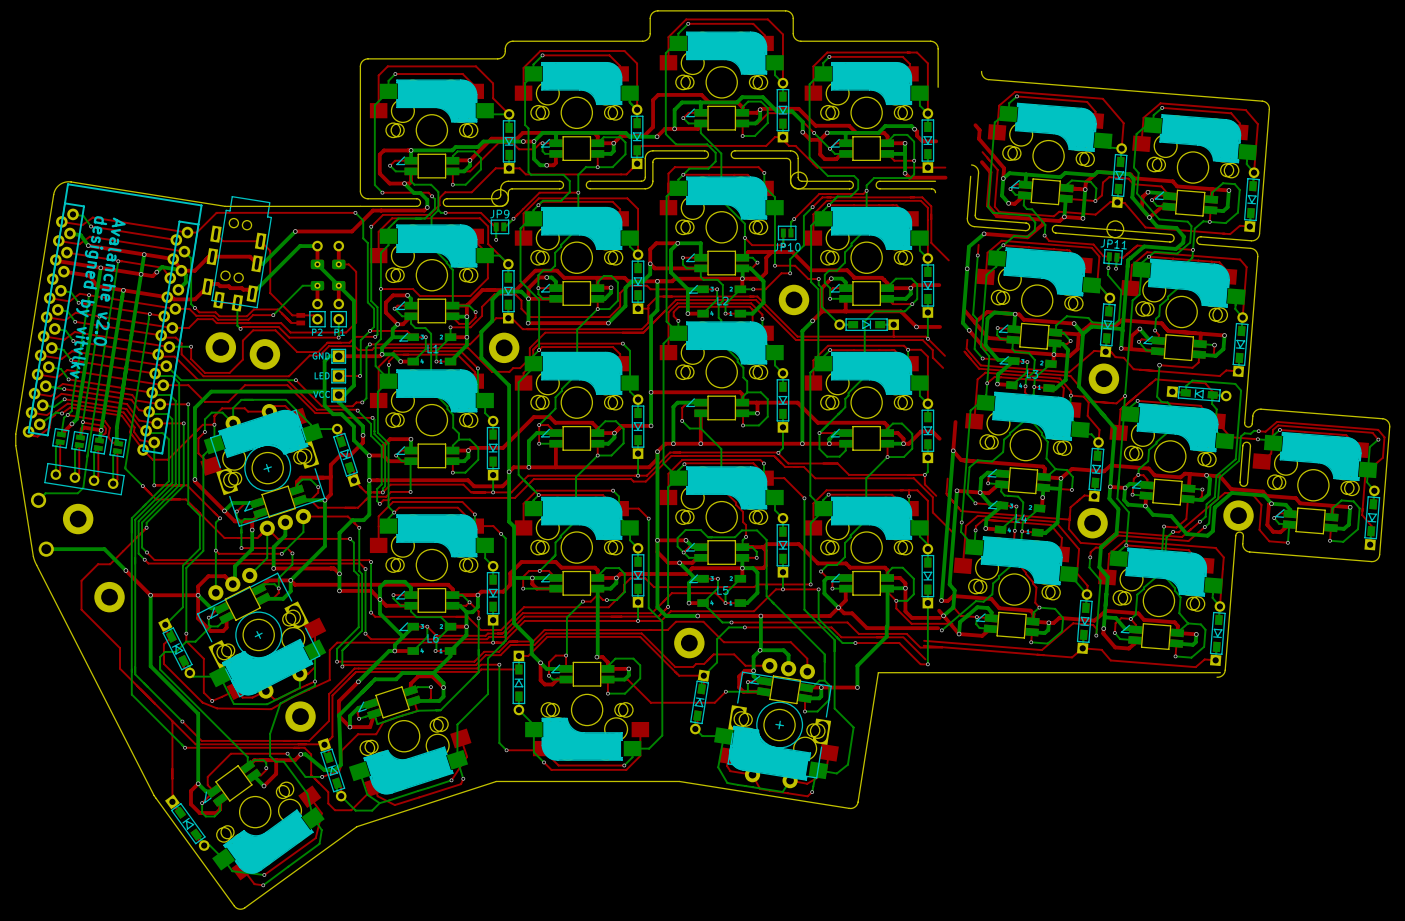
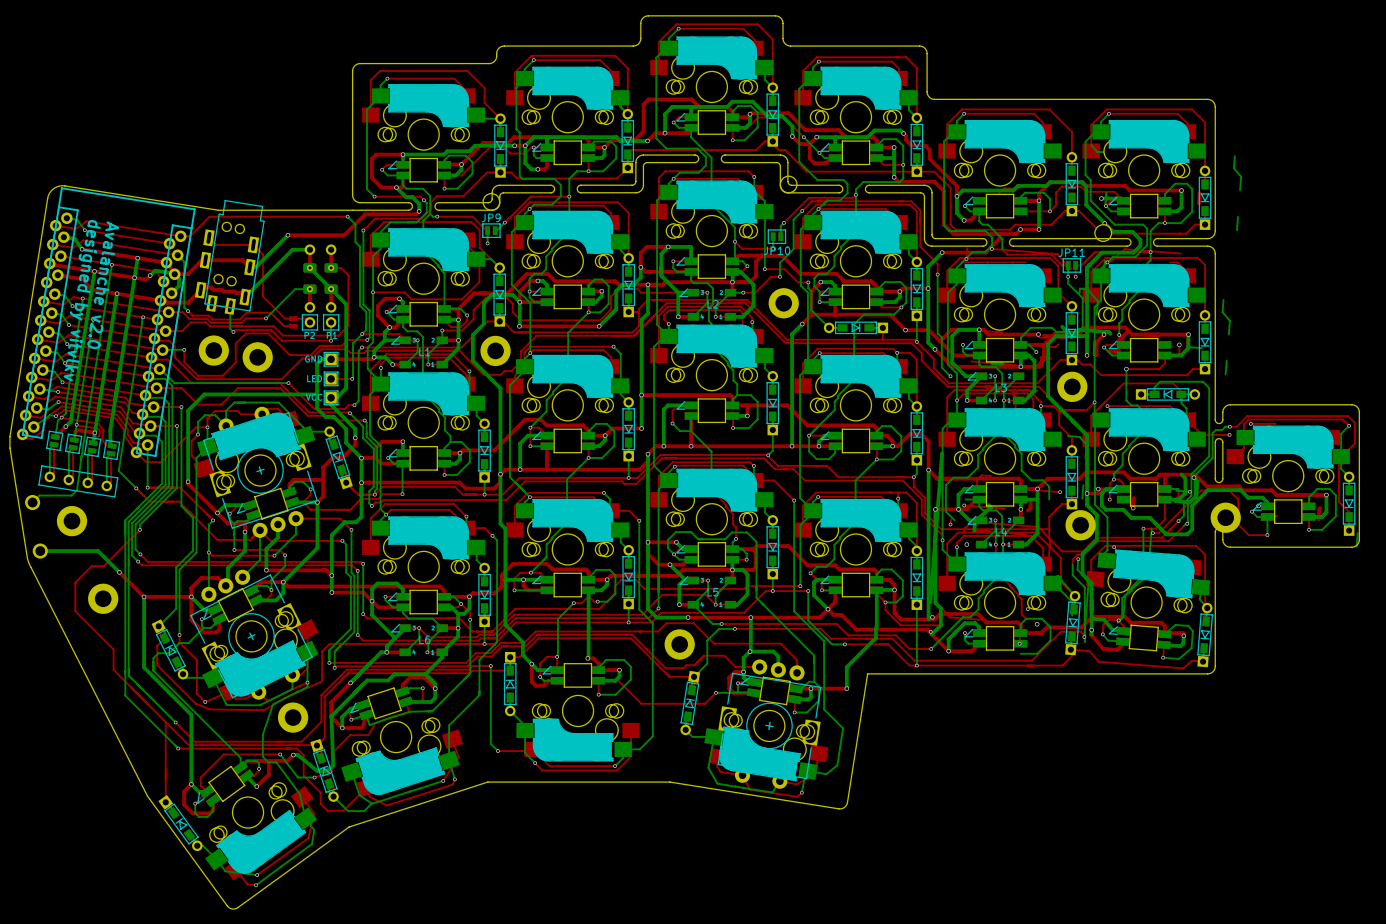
board edge: (981, 71) (983, 76) (988, 79) (1262, 101) (1268, 106) (1258, 236) (1252, 240) (1200, 236) (1196, 241) (1200, 244) (1251, 248) (1257, 253) (1245, 426) (1251, 425) (1253, 413) (1260, 409) (1382, 418) (1388, 422) (1389, 426) (1379, 554) (1377, 559) (1371, 561) (1248, 551) (1243, 546) (1242, 533) (1237, 533) (1225, 670) (1222, 675) (1217, 677) -> none
board edge: none -> (927, 91) (929, 97) (934, 99) (1207, 99) (1214, 104) (1214, 233) (1208, 238) (1156, 238) (1153, 243) (1157, 246) (1208, 246) (1214, 250) (1216, 422) (1222, 421) (1223, 409) (1229, 404) (1351, 404) (1357, 407) (1359, 412) (1359, 539) (1357, 544) (1351, 547) (1229, 547) (1223, 542) (1222, 529) (1216, 529) (1215, 666) (1213, 671) (1207, 673)
top track: (1017, 96) (1087, 101) (1095, 111) (1094, 120) -> none
bottom track: (1017, 96) (1009, 103) (1008, 113) (1005, 113) (994, 122) (988, 207) (992, 212) (1029, 215) (1035, 222) (1034, 230) (1027, 236) (1014, 235) (997, 250) (996, 266) (986, 274) (980, 346) (989, 356) (985, 402) (980, 402) (970, 410) (961, 531) (974, 547) (975, 530) -> none
via: (1017, 96) -> none
top track: (1162, 107) (1231, 113) (1239, 123) (1239, 132) -> none
bottom track: (1162, 107) (1153, 115) (1152, 125) (1147, 124) (1136, 134) (1133, 167) (1138, 172) (1137, 193) (1159, 219) (1187, 221) (1191, 226) (1190, 242) (1177, 253) (1154, 251) (1142, 262) (1139, 294) (1132, 300) (1124, 407) (1130, 414) -> none
via position: (1162, 107) -> (1108, 113)
top track: none -> (964, 113) (1034, 113) (1043, 122) (1043, 131)
bottom track: none -> (964, 113) (956, 120) (956, 131) (953, 131) (944, 141) (944, 225) (949, 231) (985, 231) (992, 237) (992, 245) (985, 252) (972, 252) (956, 267) (956, 283) (947, 293) (947, 364) (956, 373) (956, 419) (951, 419) (942, 428) (942, 549) (956, 564) (956, 547)
via: none -> (964, 113)
top track: none -> (1108, 113) (1177, 113) (1187, 123) (1187, 131)
bottom track: none -> (1108, 113) (1101, 121) (1101, 131) (1095, 131) (1085, 141) (1085, 175) (1090, 180) (1090, 184)
top track: (975, 125) (979, 130) (978, 138) (1004, 168) (1003, 178) -> none
top track: (997, 132) (999, 105) (1015, 91) (1102, 98) (1123, 123) (1120, 162) -> none
part: (1050, 137) -> none
top track: none -> (925, 145) (929, 150) (929, 158) (956, 186) (956, 196)
top track: (1141, 143) (1143, 117) (1160, 103) (1245, 110) (1257, 124) (1253, 186) -> none
top track: none -> (947, 151) (947, 124) (962, 109) (1049, 109) (1071, 131) (1071, 170)
top track: none -> (1091, 151) (1091, 125) (1106, 109) (1192, 109) (1205, 122) (1205, 184)
part: none -> (1000, 153)
part: none -> (1144, 153)
part: (1194, 148) -> none
top track: (982, 152) (997, 169) (994, 206) (999, 211) (1053, 216) (1059, 211) (1095, 214) (1110, 201) (1124, 202) (1145, 227) (1230, 234) (1239, 225) (1249, 226) (1250, 213) -> none
top track: (981, 162) (990, 172) (987, 205) (996, 216) (1059, 221) (1064, 216) (1082, 218) -> none
board edge: (971, 164) (976, 166) (978, 172) (976, 218) (1026, 223) (1029, 225) (1028, 229) (974, 226) (969, 224) (967, 218) (970, 176) -> none
top track: none -> (934, 171) (950, 188) (950, 224) (955, 229) (1010, 229) (1015, 224) (1051, 224) (1065, 211) (1079, 211) (1101, 233) (1186, 233) (1195, 224) (1205, 224) (1205, 211)
bottom track: (1026, 174) (1025, 184) -> none
part: (1119, 175) -> none
top track: none -> (934, 181) (943, 190) (943, 224) (953, 234) (1015, 234) (1020, 229) (1039, 229)
via: (1003, 178) -> none
part: none -> (1071, 184)
bottom track: none -> (1090, 184) (1090, 200) (1114, 224) (1143, 224) (1147, 228) (1147, 245) (1135, 257) (1112, 257) (1101, 268) (1101, 300) (1094, 307) (1094, 413) (1101, 419) (1094, 426) (1094, 504) (1107, 517) (1107, 550) (1101, 556) (1101, 564)
board edge: none -> (924, 185) (929, 187) (931, 191) (933, 237) (983, 238) (986, 240) (986, 244) (931, 246) (927, 244) (924, 238) (924, 196)
top track: none -> (1181, 190) (1129, 190) (1125, 185) (1086, 185) (1082, 182) (1050, 182) (1039, 193) (1039, 200)
bottom track: none -> (1181, 190) (1181, 207) (1177, 211) (1164, 211)
via: none -> (1181, 190)
top track: (1067, 188) (1084, 189) -> none
bottom track: (1067, 188) (1067, 184) (1071, 180) (1090, 181) (1096, 188) (1095, 201) -> none
bottom track: (1010, 189) (1015, 194) (1024, 195) (1023, 205) (1026, 209) (1032, 209) (1045, 224) (1044, 235) -> none
via: (1010, 189) -> none
top track: (1085, 189) (1085, 182) (1098, 171) (1130, 174) (1134, 178) (1172, 181) (1177, 186) (1228, 190) -> none
bottom track: (1085, 189) (1082, 218) -> none
via: (1085, 189) -> none
bottom track: (1228, 190) (1227, 207) (1223, 211) (1210, 210) -> none
via: (1228, 190) -> none
part: (1042, 191) -> none
via: none -> (956, 196)
top track: (1147, 192) (1142, 196) (1141, 208) (1149, 217) (1162, 206) (1168, 206) -> none
bottom track: (1147, 192) (1167, 193) (1169, 196) -> none
via: (1147, 192) -> none
part: none -> (1205, 197)
bottom track: none -> (1101, 198) (1121, 198) (1123, 200)
via: none -> (1101, 198)
top track: (1024, 195) (1014, 203) (1008, 203) -> none
bottom track: none -> (1020, 200) (1020, 197) (1025, 192) (1043, 192) (1049, 198) (1049, 211)
top track: none -> (1038, 200) (1020, 200)
bottom track: none -> (1039, 200) (1039, 229)
via: none -> (1039, 200)
bottom track: none -> (1164, 200) (1164, 193) (1175, 183) (1186, 183) (1192, 189) (1192, 211) (1180, 223) (1158, 223) (1150, 231) (1150, 260) (1144, 266) (1144, 285) (1122, 309) (1119, 335)
top track: (1066, 198) (1095, 201) (1101, 195) (1102, 182) (1109, 177) (1128, 178) (1133, 184) (1161, 186) (1169, 196) (1157, 195) (1151, 200) -> none
bottom track: (1066, 198) (1064, 216) -> none
bottom track: (1211, 199) (1212, 192) (1223, 183) (1234, 184) (1239, 189) (1237, 212) (1225, 223) (1203, 221) (1194, 228) (1192, 257) (1185, 263) (1183, 283) (1160, 305) (1155, 330) -> none
part: (1251, 199) -> none
bottom track: (1151, 200) (1156, 205) (1168, 206) -> none
via: (1151, 200) -> none
via: (1095, 201) -> none
bottom track: none -> (964, 206) (970, 211) (979, 211) (979, 221) (982, 224) (987, 224) (1002, 238) (1002, 249)
via: none -> (964, 206)
part: none -> (996, 206)
top track: none -> (1105, 206) (1111, 200) (1123, 200) (1114, 191) (1086, 191) (1081, 186) (1061, 186) (1056, 192) (1056, 205) (1049, 211) (1020, 211)
bottom track: none -> (1105, 206) (1111, 211) (1123, 211)
via: none -> (1105, 206)
part: none -> (1140, 206)
bottom track: (1008, 203) (1001, 195) (1003, 178) (1009, 173) (1060, 177) (1065, 172) (1093, 175) (1097, 171) (1129, 174) (1133, 179) (1132, 197) (1157, 226) (1176, 228) (1183, 236) (1183, 242) (1175, 248) (1144, 246) (1130, 257) -> none
via: (1008, 203) -> none
part: (1186, 203) -> none
top track: none -> (979, 211) (970, 220) (964, 220)
via: none -> (1049, 211)
top track: none -> (1164, 211) (1164, 223)
top track: (1210, 210) (1209, 221) -> none
bottom track: none -> (964, 220) (956, 213) (956, 196) (962, 190) (1013, 190) (1018, 185) (1046, 185) (1049, 182) (1081, 182) (1086, 186) (1086, 204) (1113, 231) (1132, 231) (1140, 239) (1140, 245) (1133, 252) (1101, 252) (1089, 264)
via: none -> (964, 220)
via: (1064, 216) -> none
via: (1149, 217) -> none
via: (1082, 218) -> none
top track: (1043, 219) (1042, 224) (1027, 237) (984, 233) -> none
via: none -> (1104, 223)
via: none -> (1164, 223)
via: (1209, 221) -> none
via: none -> (1020, 229)
via: none -> (1039, 229)
board edge: (1056, 225) (1170, 234) (1174, 238) (1170, 242) (1055, 233) (1052, 228) (1056, 225) -> none
top track: none -> (1000, 234) (999, 238) (985, 252) (942, 252)
bottom track: (984, 233) (968, 246) (962, 323) (969, 330) -> none
via: (984, 233) -> none
board edge: none -> (1127, 238) (1013, 238) (1009, 242) (1013, 246) (1127, 246) (1130, 242) (1127, 238)
top track: (1044, 235) (1049, 241) (1093, 244) (1103, 256) (1109, 256) (1108, 268) -> none
via: (1044, 235) -> none
top track: none -> (1002, 249) (1007, 254) (1051, 254) (1062, 265) (1068, 265) (1068, 276)
bottom track: none -> (942, 252) (928, 266) (928, 342) (935, 349)
via: none -> (942, 252)
top track: none -> (1150, 252) (1094, 252) (1081, 265) (1075, 265) (1075, 276)
via: none -> (1150, 252)
via: (1193, 249) -> none
bottom track: (977, 255) (973, 314) (976, 319) (974, 349) (982, 358) -> none
bottom track: (1109, 256) (1107, 274) (1121, 290) (1119, 320) (1114, 324) (1092, 322) (1088, 318) (1066, 316) (1056, 325) (1055, 332) (1064, 333) (1070, 341) -> none
part: (1113, 256) -> none
top track: (1148, 256) (1219, 262) (1228, 272) (1227, 276) -> none
via: (1148, 256) -> none
bottom track: (1130, 257) (1128, 260) (1121, 348) -> none
top track: none -> (987, 262) (962, 262)
top track: none -> (1012, 262) (987, 262)
top track: none -> (1025, 262) (1012, 262)
via: none -> (1107, 262)
top track: none -> (1170, 262) (1177, 262) (1187, 271) (1187, 275)
top track: none -> (937, 263) (937, 274)
bottom track: none -> (1068, 265) (1068, 283) (1082, 298) (1082, 327) (1078, 331) (1056, 331) (1052, 327) (1030, 327) (1020, 337) (1020, 344) (1029, 344) (1036, 352)
part: none -> (1071, 265)
bottom track: none -> (1089, 264) (1087, 267) (1087, 355)
via: (967, 268) -> none
via: (1108, 268) -> none
via: (1116, 268) -> none
bottom track: none -> (937, 274) (937, 333) (941, 337) (941, 367) (950, 376)
via: none -> (937, 274)
via: none -> (1068, 276)
via: none -> (1075, 276)
top track: (985, 276) (987, 252) (1001, 240) (1091, 247) (1099, 256) (1097, 283) (1109, 297) (1108, 311) -> none
part: (1038, 281) -> none
via: none -> (928, 288)
top track: (1130, 288) (1131, 265) (1147, 252) (1240, 259) (1246, 267) (1241, 331) -> none
top track: none -> (947, 295) (947, 271) (960, 258) (1050, 258) (1058, 266) (1058, 292) (1071, 306) (1071, 319)
top track: none -> (1091, 295) (1091, 272) (1105, 258) (1198, 258) (1205, 265) (1205, 328)
part: none -> (1000, 297)
part: none -> (1144, 297)
part: (1183, 293) -> none
top track: (964, 310) (988, 337) (1013, 339) -> none
via: (1015, 314) -> none
top track: (974, 322) (987, 311) (1019, 314) (1023, 319) (1074, 323) -> none
via: (1074, 323) -> none
part: (1107, 325) -> none
top track: none -> (928, 330) (954, 355) (979, 355)
via: none -> (979, 329)
bottom track: (997, 328) (997, 334) (1000, 338) (1013, 339) (1012, 349) (1014, 351) (1028, 352) (1034, 359) (1033, 372) (1026, 378) (1025, 386) -> none
via: (997, 328) -> none
bottom track: (1139, 328) (1149, 339) (1158, 340) -> none
via: (1139, 328) -> none
bottom track: (1013, 329) (1015, 314) (994, 312) (987, 318) (985, 345) (997, 359) (1006, 360) -> none
part: none -> (1071, 333)
top track: (969, 330) (985, 349) (1069, 355) (1077, 349) (1078, 334) (1090, 324) (1114, 326) (1121, 320) (1161, 323) (1168, 331) (1224, 335) -> none
via: (969, 330) -> none
top track: (1155, 330) (1158, 334) (1158, 340) (1141, 339) (1138, 341) -> none
via: (1155, 330) -> none
top track: none -> (1038, 334) (988, 334) (983, 329) (951, 329) (940, 341)
via: none -> (1038, 334)
top track: none -> (1104, 334) (1096, 342) (1095, 355)
via: none -> (1104, 334)
top track: none -> (1119, 335) (1123, 339) (1123, 344) (1106, 344) (1104, 347)
via: none -> (1119, 335)
top track: none -> (1188, 334) (1132, 334) (1125, 327) (1085, 327) (1079, 333) (1054, 333) (1043, 344)
bottom track: none -> (1188, 334) (1188, 348) (1181, 355) (1164, 355)
via: none -> (1188, 334)
bottom track: (1083, 333) (1078, 386) (1114, 428) (1109, 498) (1118, 509) (1116, 533) (1100, 547) (1099, 567) (1107, 577) (1103, 628) -> none
bottom track: none -> (1087, 337) (1056, 336) (1048, 344) (1048, 396) (1087, 435) (1087, 505) (1096, 515) (1096, 539) (1082, 554) (1082, 574) (1091, 583) (1091, 634)
bottom track: (1224, 335) (1223, 349) (1215, 355) (1199, 354) -> none
via: (1224, 335) -> none
part: (1030, 336) -> none
top track: (967, 339) (966, 348) (980, 365) (1069, 372) (1094, 350) (1111, 352) (1115, 357) (1123, 357) (1133, 369) (1219, 376) (1226, 370) (1238, 371) (1239, 357) -> none
part: none -> (1205, 342)
bottom track: none -> (963, 344) (963, 351) (966, 355) (979, 355) (979, 364) (981, 367) (995, 367) (1002, 373) (1002, 385) (995, 392) (995, 400)
via: none -> (963, 344)
bottom track: none -> (979, 344) (979, 329) (958, 329) (952, 336) (952, 362) (965, 376) (981, 376)
top track: none -> (1043, 344) (1020, 344)
top track: none -> (1043, 344) (1043, 359) (1036, 366) (952, 366) (935, 349)
via: (1070, 341) -> none
bottom track: (1138, 341) (1146, 350) (1157, 351) -> none
via: (1138, 341) -> none
top track: none -> (1179, 344) (1179, 353) (1177, 355) (1164, 355) (1164, 363) (1159, 369) (1126, 369)
via: none -> (1179, 344)
bottom track: none -> (1104, 347) (1112, 355) (1123, 355)
via: none -> (1104, 347)
part: (1240, 344) -> none
top track: (1214, 345) (1213, 353) (1211, 355) (1199, 354) (1198, 362) (1192, 367) (1159, 365) -> none
via: (1214, 345) -> none
via: none -> (935, 349)
part: none -> (996, 350)
part: none -> (1140, 350)
part: (1175, 347) -> none
via: (1121, 348) -> none
via: none -> (1036, 352)
top track: (1129, 349) (1157, 351) -> none
top track: (964, 351) (979, 368) (1070, 375) (1092, 401) (1116, 403) (1125, 396) -> none
via: none -> (1087, 355)
top track: none -> (1205, 355) (1205, 369) (1192, 369) (1186, 375) (1101, 375) (1090, 364) (1082, 364) (1077, 360) (1060, 360) (1037, 383) (949, 383) (933, 367) (933, 358)
bottom track: (1053, 354) (1054, 343) (1062, 343) (1068, 349) (1065, 379) (1055, 388) (1049, 388) -> none
via: (1053, 354) -> none
via: (982, 358) -> none
bottom track: (1014, 361) (998, 374) (997, 384) -> none
bottom track: (1027, 362) (1026, 372) (1011, 385) -> none
via: (1027, 362) -> none
bottom track: none -> (1020, 366) (1020, 355) (1028, 355) (1034, 361) (1034, 391) (1025, 400) (1018, 400)
via: none -> (1020, 366)
bottom track: (1050, 363) (1034, 377) (1033, 394) (1028, 399) (1026, 418) (1004, 439) (1003, 452) (992, 461) (977, 460) (969, 467) (967, 493) (975, 503) -> none
bottom track: (1159, 365) (1157, 396) (1161, 401) (1167, 402) (1173, 409) (1172, 428) (1149, 449) (1148, 461) (1138, 469) (1138, 474) -> none
via: (1159, 365) -> none
bottom track: none -> (1126, 369) (1126, 400) (1131, 405) (1137, 405) (1143, 411) (1143, 431) (1122, 453) (1122, 465) (1113, 473) (1113, 479)
via: none -> (1126, 369)
top track: none -> (932, 370) (947, 386) (1038, 386) (1062, 410) (1086, 410) (1094, 402)
via: none -> (950, 376)
bottom track: none -> (981, 376) (967, 390) (967, 400)
bottom track: none -> (995, 376) (995, 386) (981, 400)
via: none -> (995, 376)
bottom track: none -> (1018, 376) (1003, 391) (1003, 408) (998, 412) (998, 432) (978, 454) (978, 467) (967, 477) (953, 477) (945, 485) (945, 511) (954, 520)
part: (1028, 374) -> none
part position: (1103, 378) -> (1072, 386)
top track: (987, 383) (994, 376) (1058, 381) (1063, 388) (1062, 401) (1069, 409) (1072, 409) -> none
via: (987, 383) -> none
via: (997, 384) -> none
part: none -> (996, 388)
via: (1025, 386) -> none
via: (1034, 386) -> none
bottom track: none -> (1141, 394) (1154, 394) (1154, 387) (1160, 381) (1202, 381) (1209, 387) (1209, 456) (1191, 474) (1191, 495) (1183, 503) (1183, 515) (1178, 521)
bottom track: (1172, 391) (1185, 392) (1186, 385) (1192, 380) (1235, 383) (1241, 390) (1235, 459) (1216, 475) (1214, 497) (1206, 504) (1205, 516) (1199, 521) -> none
part: none -> (1167, 394)
top track: none -> (1194, 394) (1181, 394) (1181, 391) (1173, 383) (1123, 383) (1091, 415) (1091, 439)
bottom track: none -> (1194, 394) (1181, 394) (1181, 403) (1186, 408) (1186, 428) (1197, 439)
part: (1199, 393) -> none
bottom track: (1070, 395) (1069, 416) (1080, 429) -> none
via: (1070, 395) -> none
top track: (1226, 395) (1212, 394) (1212, 392) (1205, 383) (1155, 379) (1120, 409) (1118, 432) -> none
bottom track: (1226, 395) (1212, 394) (1212, 403) (1216, 409) (1215, 429) (1224, 441) -> none
via: (1125, 396) -> none
top track: none -> (956, 400) (963, 393) (1027, 393) (1033, 399) (1033, 412) (1040, 419) (1043, 419) (1043, 415)
via: none -> (956, 400)
via: none -> (967, 400)
top track: none -> (981, 400) (967, 400)
via: none -> (995, 400)
via: none -> (1003, 400)
top track: none -> (1018, 400) (1003, 400)
via: none -> (1094, 402)
top track: (1137, 400) (1200, 405) (1213, 420) (1224, 421) -> none
bottom track: (1137, 400) (1130, 406) (1130, 414) -> none
via: (1137, 400) -> none
bottom track: none -> (1040, 406) (1040, 427) (1053, 439)
via: none -> (1040, 406)
top track: none -> (1107, 406) (1170, 406) (1184, 419) (1194, 419)
via: none -> (1107, 406)
bottom track: (1130, 414) (1123, 419) (1117, 498) (1128, 512) (1126, 545) (1119, 551) (1118, 558) -> none
top track: (974, 421) (977, 379) (985, 372) (1060, 378) (1071, 391) (1070, 395) (1083, 396) (1088, 402) (1087, 415) (1099, 429) (1097, 455) -> none
bottom track: (1032, 421) (1047, 441) (1046, 458) (1055, 469) -> none
top track: none -> (1187, 424) (1187, 419) (1202, 434) (1229, 434)
via: none -> (1250, 423)
top track: none -> (1275, 423) (1250, 423)
top track: (955, 422) (953, 450) (961, 460) (1043, 466) (1044, 468) (1044, 477) (1060, 478) (1072, 468) (1103, 471) (1110, 465) (1148, 468) (1154, 475) (1180, 477) (1184, 473) (1190, 474) -> none
top track: none -> (1349, 425) (1342, 419) (1248, 419) (1243, 424) (1243, 447) (1235, 456)
bottom track: none -> (1349, 425) (1341, 433) (1341, 468) (1349, 476) (1349, 490)
top track: none -> (1229, 426) (1236, 426) (1247, 416) (1348, 416) (1355, 422) (1355, 443) (1338, 459) (1338, 501) (1349, 512) (1349, 530)
bottom track: none -> (1229, 426) (1216, 429) (1212, 433) (1212, 457) (1194, 475) (1194, 497) (1187, 504) (1187, 522) (1183, 526)
via: none -> (1229, 426)
top track: (1216, 425) (1216, 421) (1230, 437) (1257, 439) -> none
part: (1027, 426) -> none
top track: (1279, 429) (1304, 431) -> none
via: (1279, 429) -> none
top track: (1258, 431) (1265, 431) (1277, 421) (1378, 429) (1384, 437) (1382, 457) (1365, 472) (1362, 515) (1371, 526) (1370, 544) -> none
bottom track: (1258, 431) (1244, 433) (1240, 436) (1239, 460) (1219, 477) (1218, 498) (1210, 505) (1209, 523) (1204, 527) -> none
via: (1258, 431) -> none
top track: (1304, 431) (1330, 433) -> none
bottom track: none -> (1004, 434) (1021, 453) (1021, 470) (1031, 480) (1042, 480) (1049, 486) (1049, 499)
via: none -> (1229, 434)
top track: (1330, 433) (1346, 435) (1359, 449) -> none
top track: none -> (947, 439) (947, 397) (954, 390) (1028, 390) (1040, 402) (1040, 406) (1053, 406) (1059, 411) (1059, 425) (1071, 437) (1071, 463)
part: (1171, 437) -> none
top track: none -> (928, 441) (928, 470) (937, 478) (1018, 478) (1020, 480) (1020, 488) (1037, 488) (1047, 478) (1079, 478) (1085, 472) (1123, 472) (1130, 478) (1155, 478) (1160, 474) (1195, 474) (1206, 486) (1238, 486) (1242, 490) (1271, 490) (1276, 495) (1326, 495)
part: none -> (1000, 441)
part: none -> (1144, 441)
board edge: none -> (1222, 442) (1222, 479) (1218, 482) (1215, 479) (1215, 441) (1219, 438) (1222, 442)
via: (1257, 439) -> none
top track: (1378, 439) (1372, 432) (1278, 425) (1273, 429) (1271, 453) (1261, 461) -> none
bottom track: (1378, 439) (1369, 446) (1367, 482) (1374, 490) (1373, 504) -> none
via position: (1378, 439) -> (1349, 425)
board edge: (1242, 445) (1240, 482) (1243, 486) (1247, 483) (1250, 445) (1246, 442) (1242, 445) -> none
via: (953, 450) -> none
part: none -> (1288, 458)
part: (1314, 466) -> none
bottom track: none -> (928, 470) (928, 619)
via: none -> (928, 470)
bottom track: (1055, 469) (1044, 477) -> none
bottom track: (1055, 469) (1066, 470) (1072, 477) (1071, 489) -> none
part: (1096, 469) -> none
top track: none -> (1165, 474) (1164, 488)
bottom track: none -> (1181, 474) (1185, 478) (1185, 493) (1178, 499) (1164, 499)
bottom track: (1002, 473) (987, 472) (981, 478) (980, 492) (990, 504) (1002, 505) -> none
part: none -> (1071, 477)
via: (1138, 474) -> none
top track: (1190, 474) (1188, 488) -> none
top track: (1190, 474) (1220, 476) (1231, 489) (1262, 491) (1266, 495) (1295, 498) (1300, 503) (1350, 507) -> none
via: none -> (1113, 479)
top track: (947, 478) (946, 493) (961, 511) (1069, 520) -> none
bottom track: (1060, 478) (1057, 522) (1045, 533) (1037, 532) -> none
via: (1060, 478) -> none
part: (1019, 480) -> none
bottom track: (988, 483) (1001, 484) (1001, 491) (1004, 495) (1018, 496) (1023, 502) (1022, 516) (1015, 522) (1014, 530) -> none
via: (988, 483) -> none
top track: (1001, 484) (999, 484) (988, 493) (956, 490) -> none
top track: (1147, 485) (1147, 479) (1143, 475) (1138, 474) (1133, 478) (1132, 494) -> none
bottom track: (1147, 485) (1129, 483) (1125, 488) (1124, 500) (1128, 504) (1145, 506) (1152, 514) (1171, 516) (1186, 534) (1207, 535) (1212, 531) (1214, 507) (1231, 492) (1264, 495) (1271, 503) (1285, 504) (1290, 510) (1290, 513) -> none
bottom track: none -> (979, 488) (964, 488) (958, 495) (958, 509) (969, 520) (981, 520)
bottom track: none -> (1037, 488) (1037, 533) (1026, 544) (1018, 544)
via: none -> (1037, 488)
top track: none -> (1123, 488) (1123, 483) (1119, 479) (1113, 479) (1109, 483) (1109, 499)
bottom track: none -> (1123, 488) (1106, 488) (1101, 493) (1101, 505) (1106, 509) (1123, 509) (1131, 517) (1150, 517) (1166, 534) (1187, 534) (1192, 529) (1192, 505) (1207, 490) (1240, 490) (1248, 497) (1262, 497) (1267, 502) (1267, 506)
top track: none -> (1178, 488) (1178, 496) (1175, 499) (1164, 499) (1164, 519) (1155, 528) (1143, 528)
bottom track: none -> (1178, 488) (1164, 488)
bottom track: (1060, 488) (1043, 487) (1042, 497) -> none
top track: none -> (1071, 490) (1071, 504) (1062, 504) (1049, 516) (1049, 538) (1062, 551) (1083, 551) (1096, 537) (1161, 537) (1178, 521)
via: (1125, 488) -> none
top track: (1202, 489) (1201, 496) (1198, 499) (1187, 499) (1186, 519) (1176, 527) (1164, 526) -> none
bottom track: (956, 490) (949, 584) (954, 590) (953, 607) (943, 615) -> none
via: (956, 490) -> none
via: none -> (1087, 493)
top track: none -> (1101, 493) (1087, 493)
via: (980, 492) -> none
part: none -> (996, 494)
part: none -> (1140, 494)
part: (1163, 492) -> none
bottom track: none -> (1326, 495) (1326, 512) (1321, 516) (1309, 516)
bottom track: (1132, 494) (1146, 495) -> none
via: (1132, 494) -> none
top track: none -> (925, 498) (925, 513) (941, 529) (1049, 529)
bottom track: none -> (1037, 499) (1020, 499) (1020, 509)
top track: (1094, 496) (1084, 495) (1070, 507) (1068, 528) (1080, 542) (1101, 544) (1116, 531) (1181, 537) (1199, 521) -> none
bottom track: none -> (965, 499) (979, 499) (979, 506) (982, 510) (996, 510) (1002, 515) (1002, 530) (995, 536) (995, 544)
top track: none -> (979, 499) (976, 499) (966, 509) (935, 509)
via: (1042, 497) -> none
via: none -> (1109, 499)
part: none -> (1349, 503)
top track: (1271, 503) (1268, 504) (1267, 524) (1273, 531) (1280, 532) (1289, 524) -> none
bottom track: none -> (1309, 506) (1309, 497) (1317, 488) (1329, 488) (1335, 495) (1335, 516) (1322, 529) (1309, 529)
bottom track: (1016, 506) (1015, 516) (1000, 529) -> none
via: (1016, 506) -> none
bottom track: none -> (935, 509) (935, 602) (940, 608) (940, 625) (931, 634)
via: none -> (935, 509)
via: none -> (958, 509)
top track: none -> (1020, 509) (1020, 518) (1018, 520)
via: none -> (1020, 509)
bottom track: (1350, 507) (1348, 524) (1343, 528) (1331, 527) -> none
via position: (1350, 507) -> (1326, 495)
bottom track: (1039, 508) (1022, 522) (1021, 539) (1017, 542) (1016, 561) (993, 583) (992, 594) (983, 601) (976, 601) (941, 630) -> none
bottom track: none -> (1251, 511) (1257, 516) (1267, 516) (1267, 535)
via: none -> (1251, 511)
part: none -> (1284, 511)
top track: none -> (1309, 516) (1309, 529)
bottom track: (1331, 517) (1332, 508) (1341, 500) (1353, 501) (1359, 508) (1358, 529) (1343, 541) (1330, 540) -> none
part: (1372, 517) -> none
bottom track: none -> (995, 520) (995, 530) (981, 544)
via: none -> (995, 520)
part: (1016, 518) -> none
bottom track: none -> (1018, 520) (1003, 535) (1003, 552) (999, 556) (999, 574) (978, 598) (978, 609) (970, 617) (962, 617) (931, 648)
bottom track: (1274, 518) (1279, 523) (1289, 524) (1287, 542) -> none
via: (1274, 518) -> none
via: none -> (1178, 521)
part: (1306, 520) -> none
top track: none -> (1183, 526) (1168, 541) (1098, 541) (1084, 554) (1077, 554) (1072, 559) (1072, 564)
bottom track: none -> (1143, 528) (1143, 575) (1122, 598) (1122, 618) (1117, 622)
via: none -> (1143, 528)
via: (1164, 526) -> none
top track: (1204, 527) (1188, 541) (1117, 535) (1103, 548) (1095, 547) (1090, 552) (1090, 557) -> none
via: (1204, 527) -> none
top track: (1331, 527) (1330, 540) -> none
via: (985, 528) -> none
via: (975, 530) -> none
part: none -> (996, 532)
top track: (1014, 530) (1014, 539) (1017, 543) (1016, 561) (1036, 587) (1035, 602) (1039, 607) -> none
via: (1014, 530) -> none
via: (1022, 531) -> none
top track: none -> (1152, 533) (1158, 533) (1201, 490) (1229, 490) (1238, 499) (1238, 524) (1248, 535) (1267, 535)
via: none -> (1152, 533)
top track: (1173, 531) (1178, 532) (1225, 492) (1253, 495) (1261, 504) (1259, 529) (1269, 541) (1287, 542) -> none
bottom track: (1173, 531) (1166, 537) (1163, 574) (1180, 597) (1179, 613) (1188, 623) -> none
via: (1173, 531) -> none
via: none -> (1267, 535)
via: none -> (942, 540)
via position: (1330, 540) -> (1309, 529)
via: none -> (966, 544)
top track: none -> (995, 544) (995, 553) (999, 556) (999, 574) (1021, 599) (1021, 614) (1026, 618)
via: none -> (995, 544)
via: none -> (1003, 544)
top track: none -> (1018, 544) (1003, 544)
via: (1287, 542) -> none
top track: none -> (956, 547) (956, 543) (964, 535) (1030, 535) (1043, 548) (1043, 564)
via: none -> (956, 547)
top track: (1126, 545) (1188, 550) (1201, 565) (1205, 565) -> none
bottom track: none -> (1072, 564) (1072, 575) (1084, 587) (1084, 642)
top track: (962, 565) (966, 525) (977, 515) (1055, 521) (1079, 549) (1077, 573) (1087, 585) (1085, 607) -> none
part: (1016, 570) -> none
top track: (1107, 577) (1109, 553) (1124, 540) (1215, 547) (1223, 557) (1218, 619) -> none
top track: none -> (947, 583) (947, 543) (957, 532) (1035, 532) (1060, 557) (1060, 582) (1072, 593) (1072, 615)
bottom track: none -> (1053, 583) (1072, 602) (1072, 615)
top track: none -> (1091, 583) (1091, 560) (1105, 545) (1196, 545) (1205, 554) (1205, 616)
part: none -> (1000, 585)
top track: (941, 600) (947, 601) (953, 596) (991, 598) (999, 608) (1030, 610) (1033, 613) (1032, 621) (1053, 623) (1059, 617) (1094, 620) (1105, 610) (1138, 613) (1144, 619) (1174, 622) (1177, 626) (1177, 632) (1196, 634) -> none
via: (941, 600) -> none
top track: (939, 610) (959, 634) (982, 635) (990, 628) -> none
top track: none -> (928, 619) (934, 619) (940, 613) (977, 613) (986, 622) (1017, 622) (1020, 625) (1020, 633) (1041, 633) (1046, 627) (1081, 627) (1092, 616) (1124, 616) (1130, 622) (1161, 622) (1164, 626) (1164, 633) (1183, 633)
bottom track: (976, 617) (976, 624) (979, 628) (990, 628) -> none
via position: (976, 617) -> (964, 633)
bottom track: (991, 618) (991, 612) (987, 608) (977, 607) (960, 622) (959, 634) -> none
bottom track: (1032, 621) (1033, 612) (1039, 607) (1055, 608) (1063, 618) (1062, 631) (1047, 643) (1031, 642) -> none
bottom track: (1048, 622) (1048, 629) (1044, 633) (1032, 632) -> none
part: (1008, 625) -> none
top track: none -> (927, 629) (948, 651) (971, 651) (979, 643)
bottom track: none -> (964, 633) (964, 640) (968, 643) (979, 643)
bottom track: none -> (979, 633) (979, 627) (975, 623) (964, 623) (948, 639) (948, 651)
bottom track: none -> (1020, 633) (1020, 624) (1026, 618) (1041, 618) (1050, 627) (1050, 640) (1037, 653) (1020, 653)
via position: (959, 634) -> (948, 651)
top track: (1096, 635) (1096, 629) (1093, 624) (1073, 623) (1041, 650) (924, 640) -> none
part: none -> (996, 638)
top track: none -> (1084, 642) (1084, 635) (1080, 631) (1060, 631) (1031, 660) (914, 660)
top track: (923, 645) (1072, 657) (1082, 648) -> none
via: none -> (931, 648)
top track: none -> (1072, 655) (1062, 665) (916, 665)

